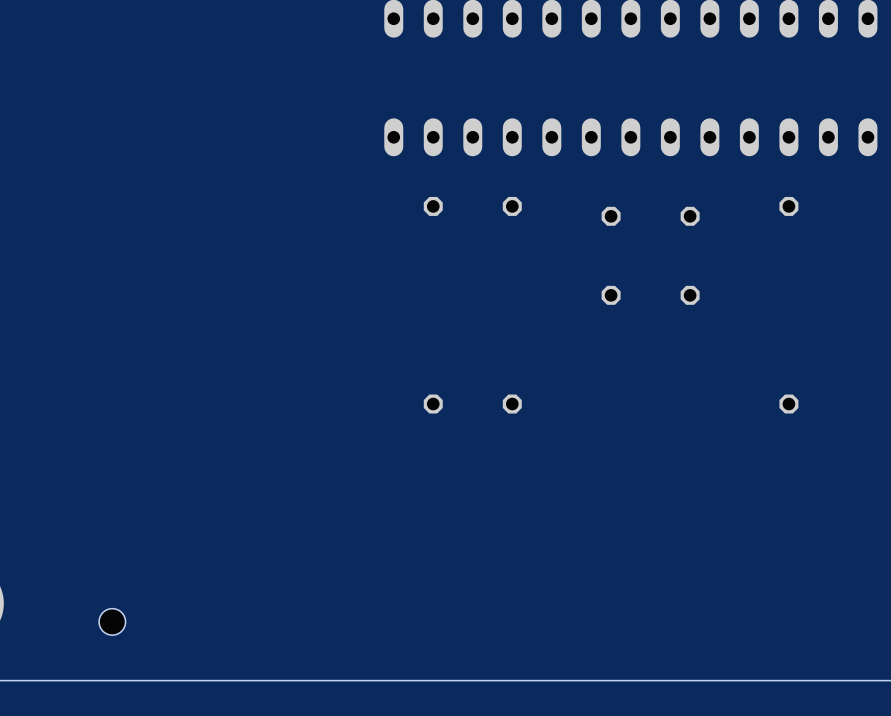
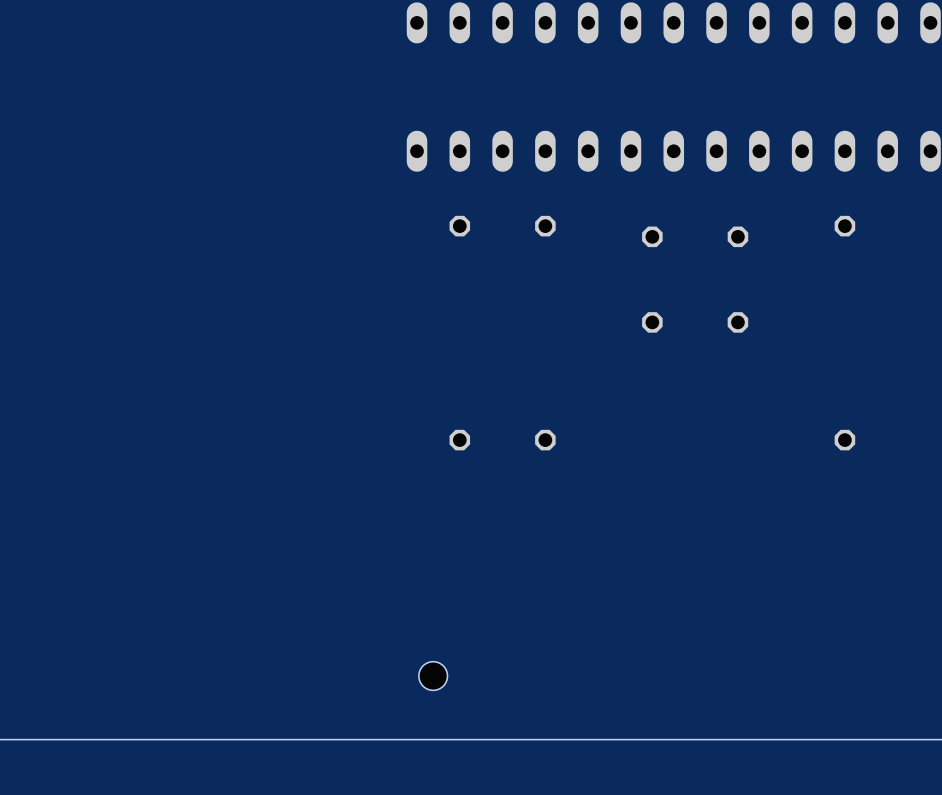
part position: (112, 621) -> (433, 676)

